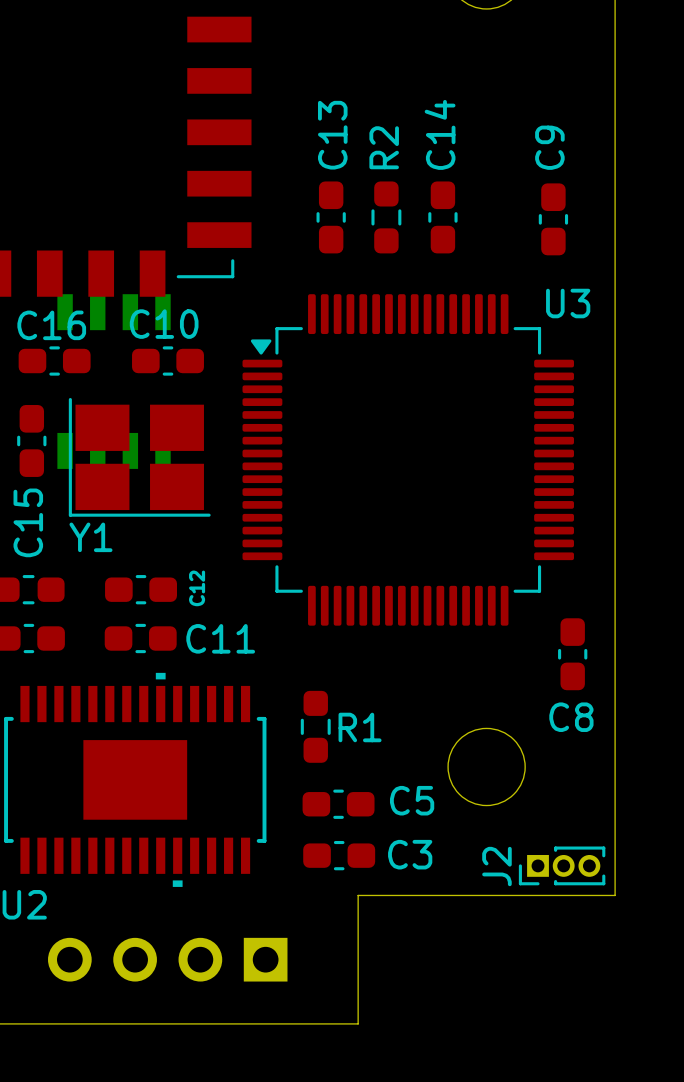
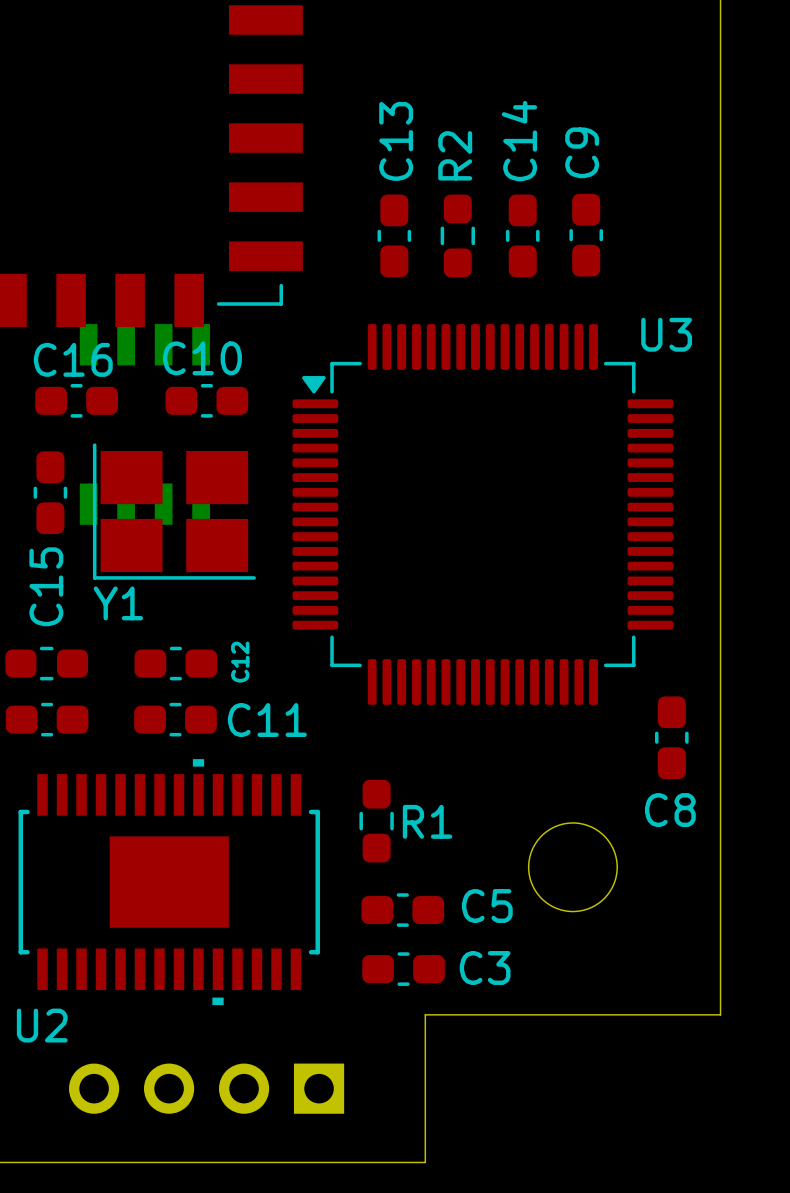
C9 position: (553, 219) -> (586, 235)
J2: (562, 865) -> none

